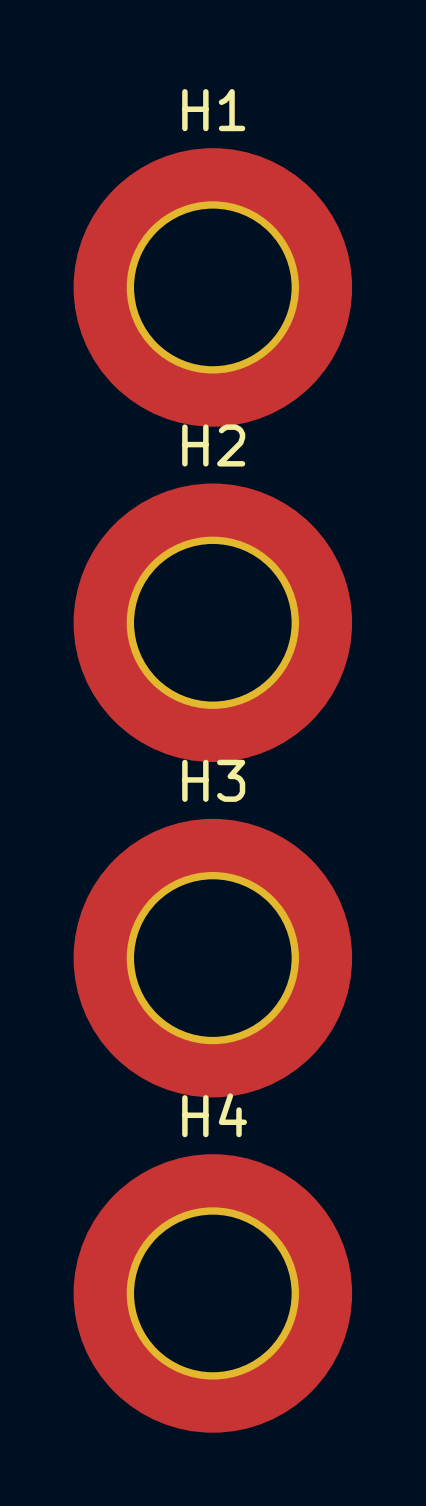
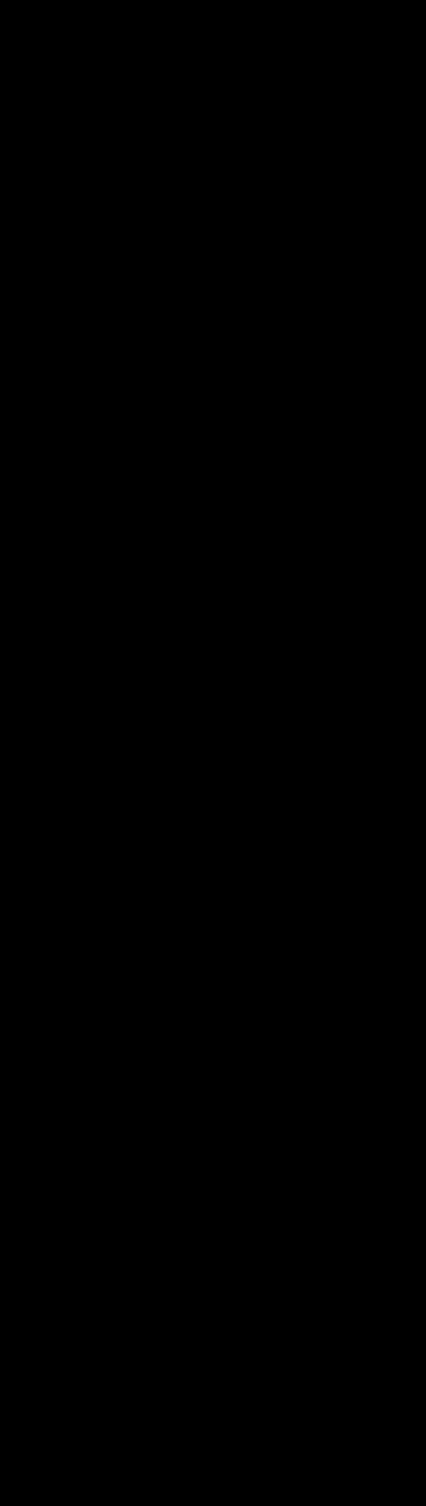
H1: (212, 287) -> none
H2: (212, 622) -> none
H3: (212, 958) -> none
H4: (212, 1293) -> none

